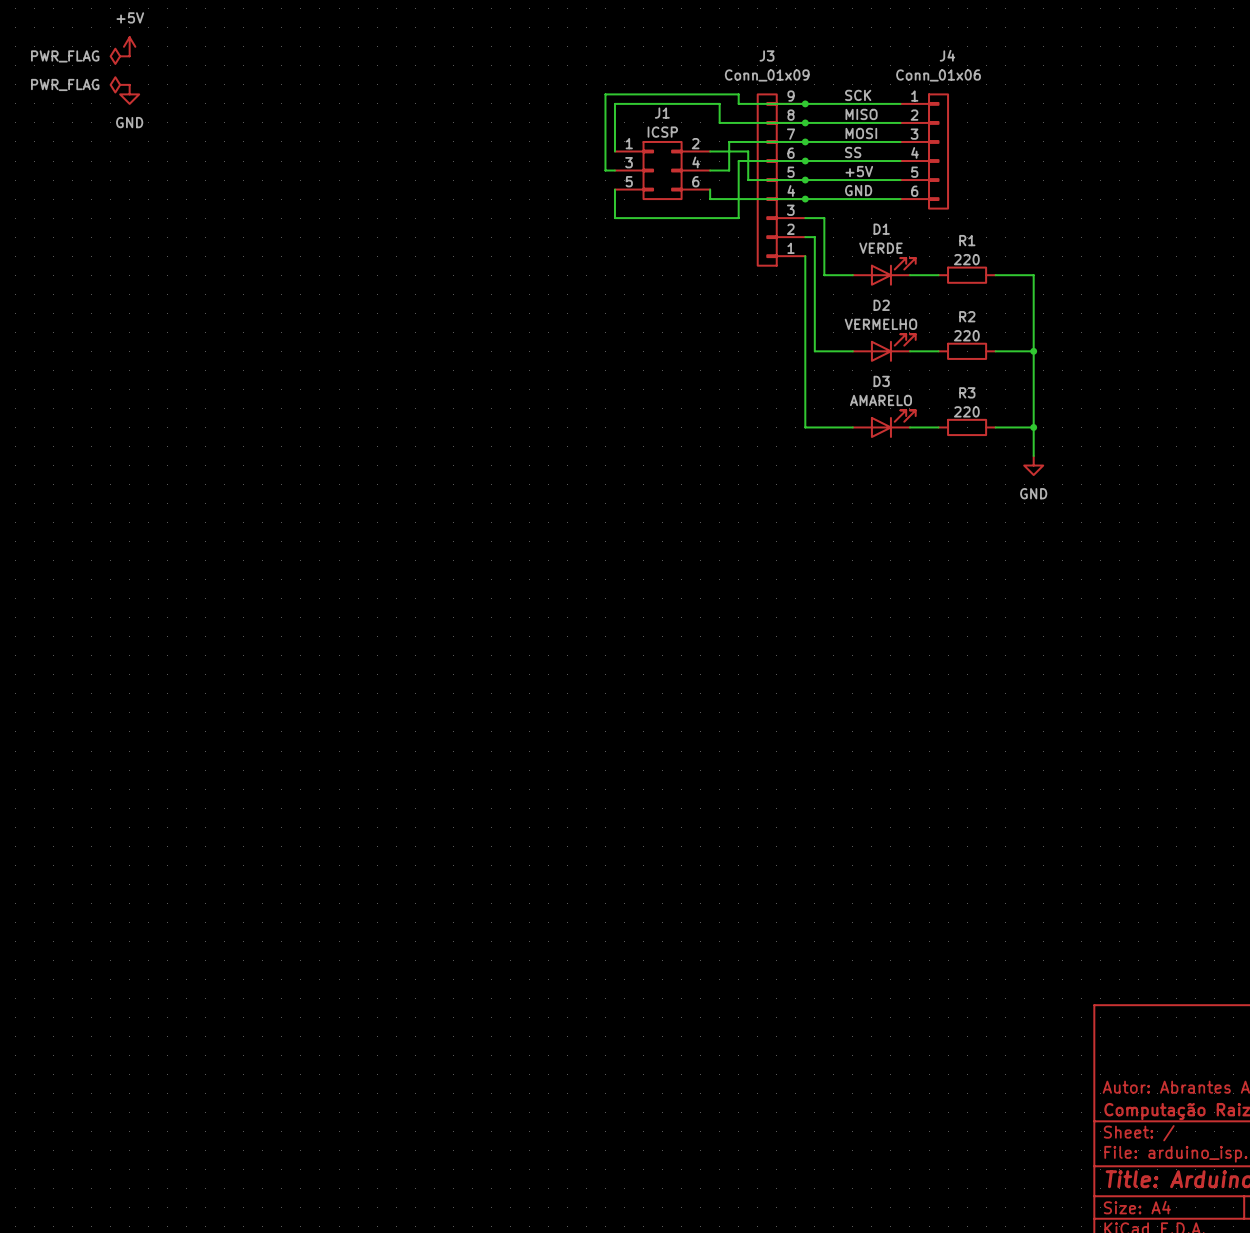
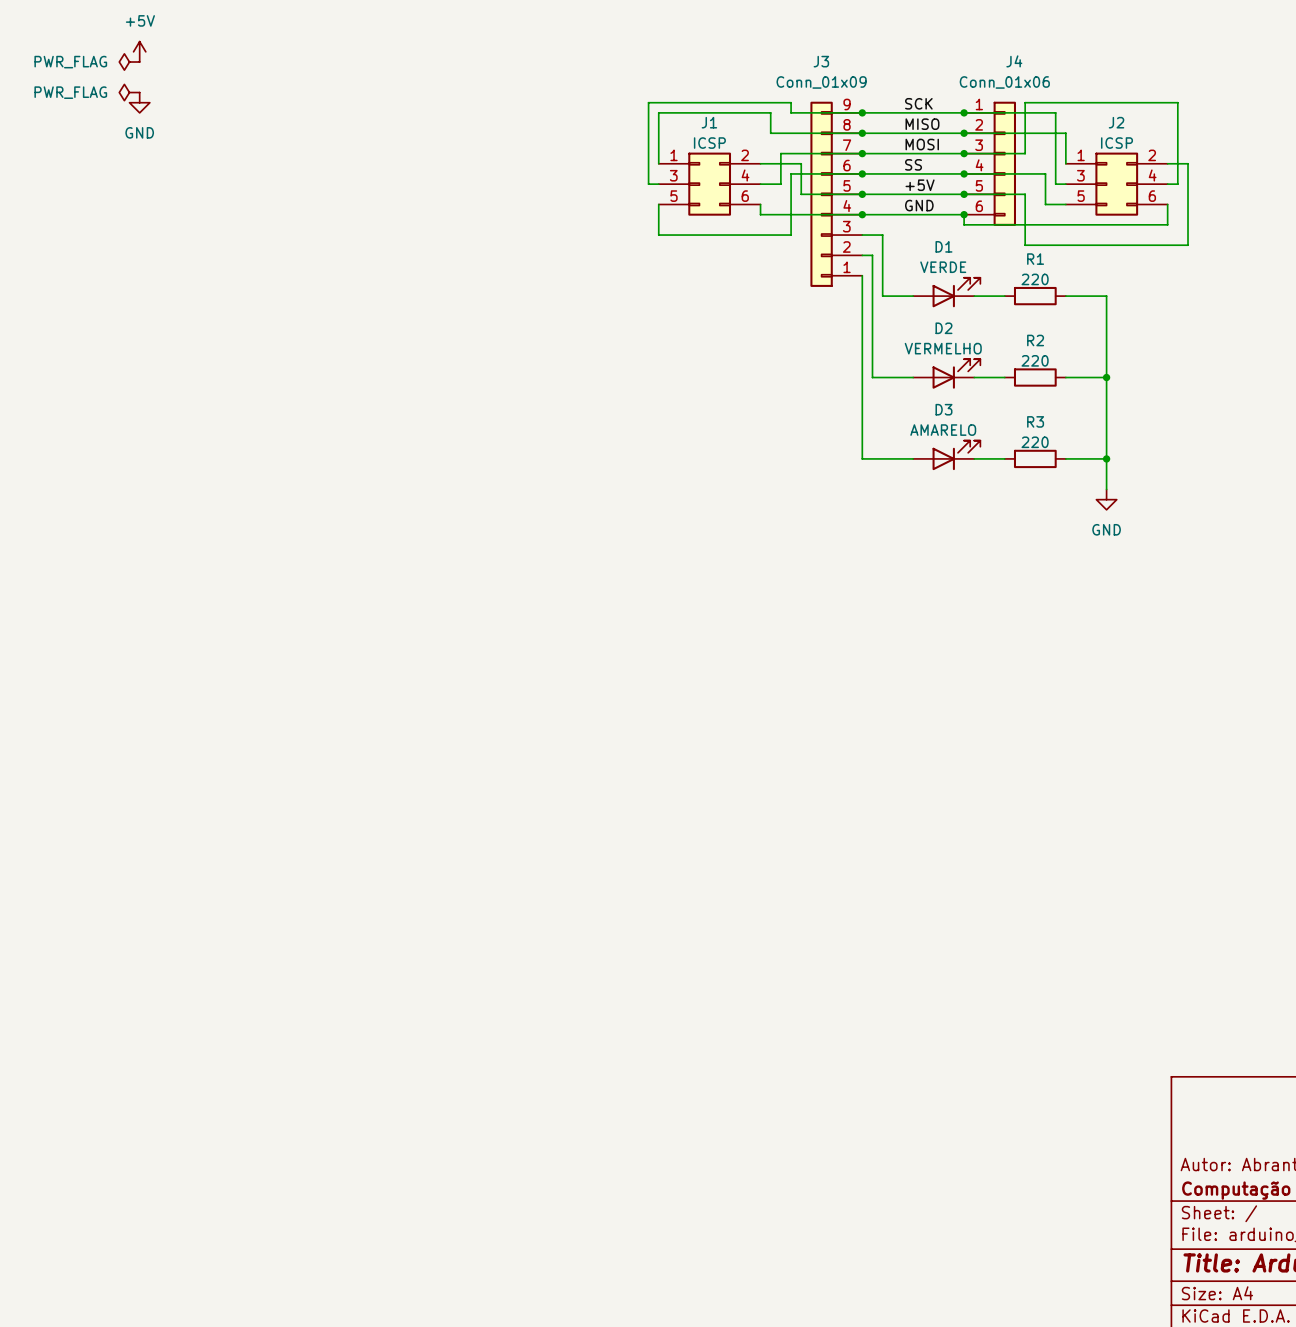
wire: none -> (964, 112) (1055, 112) (1055, 184) (1065, 184)
junction: none -> (964, 112)
wire: none -> (964, 133) (1065, 133) (1065, 163)
junction: none -> (964, 133)
wire: none -> (964, 153) (1025, 153) (1025, 102) (1177, 102) (1177, 184) (1167, 184)
junction: none -> (964, 153)
wire: none -> (1167, 163) (1188, 163) (1188, 245) (1025, 245) (1025, 194) (964, 194)
wire: none -> (964, 173) (1045, 173) (1045, 204) (1065, 204)
junction: none -> (964, 173)
J2: none -> ICSP (1116, 184)
junction: none -> (964, 194)
wire: none -> (1167, 204) (1167, 224) (964, 224) (964, 214)
junction: none -> (964, 214)

